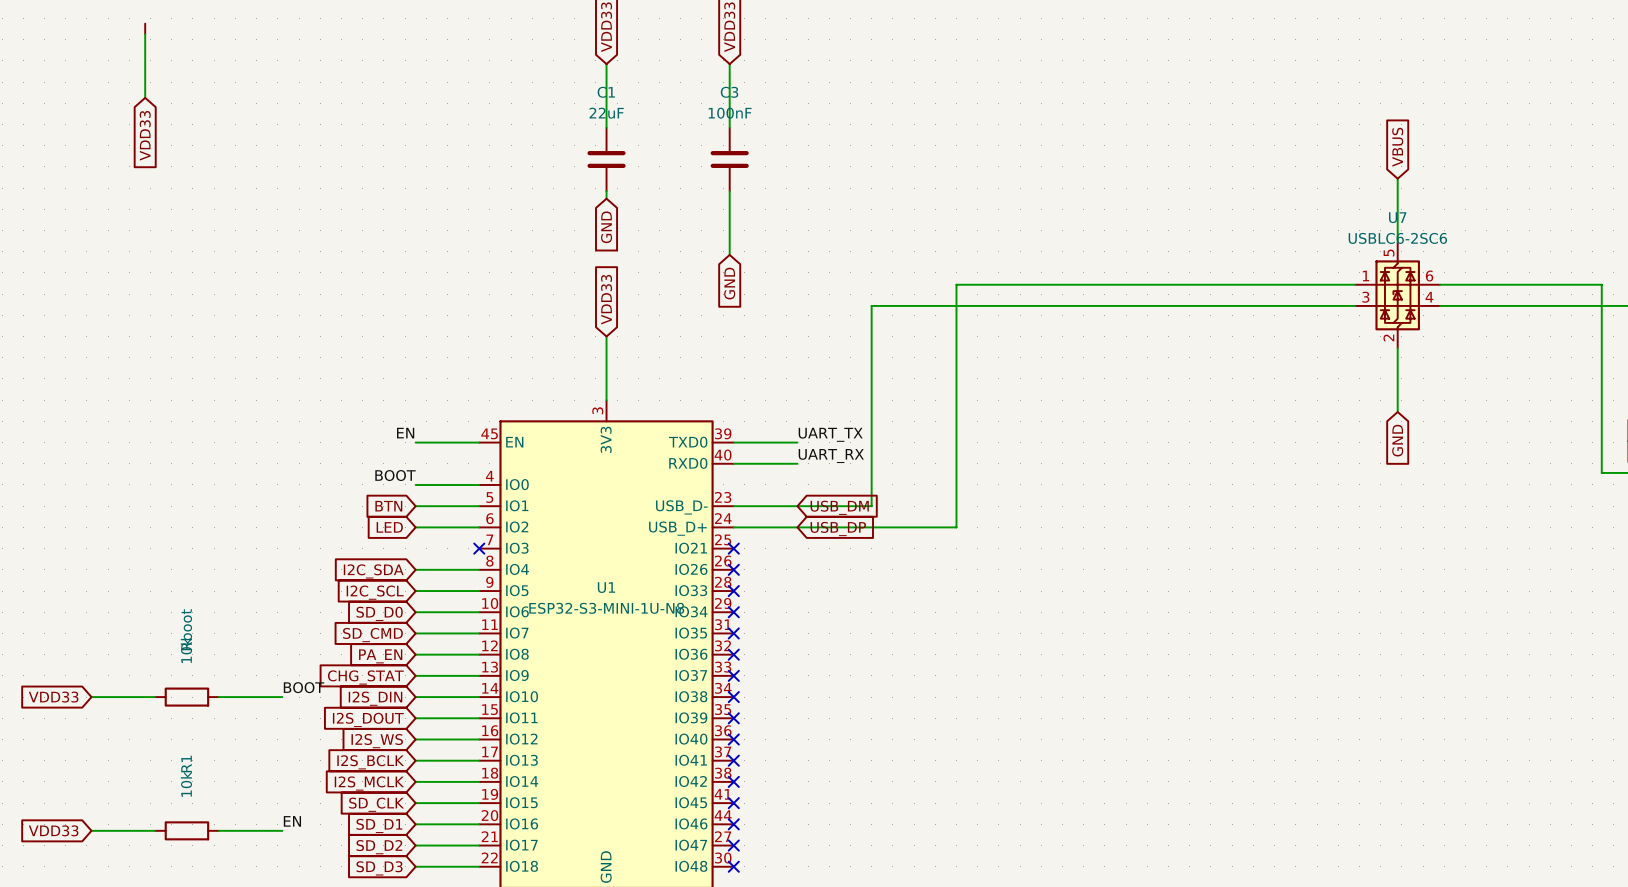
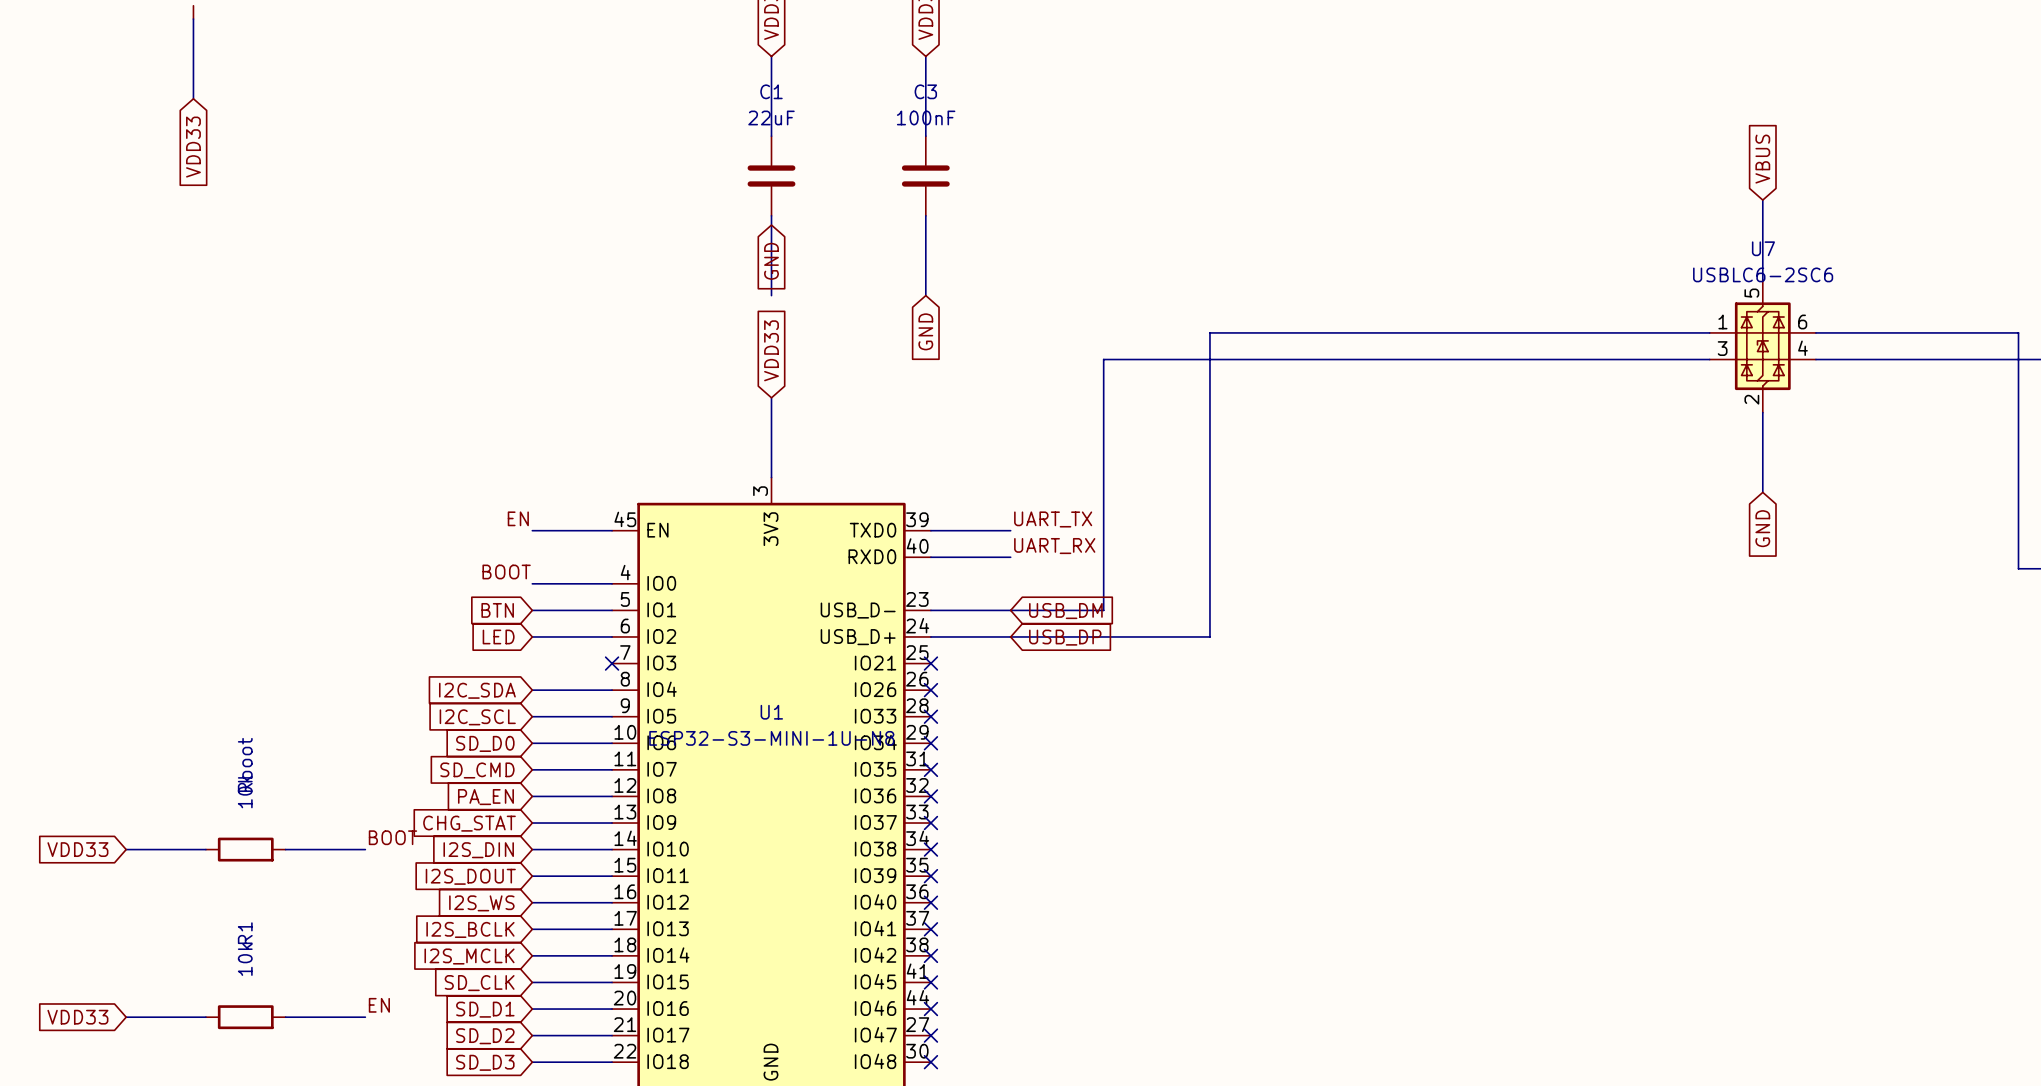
wire: none -> (771, 225) (771, 295)

